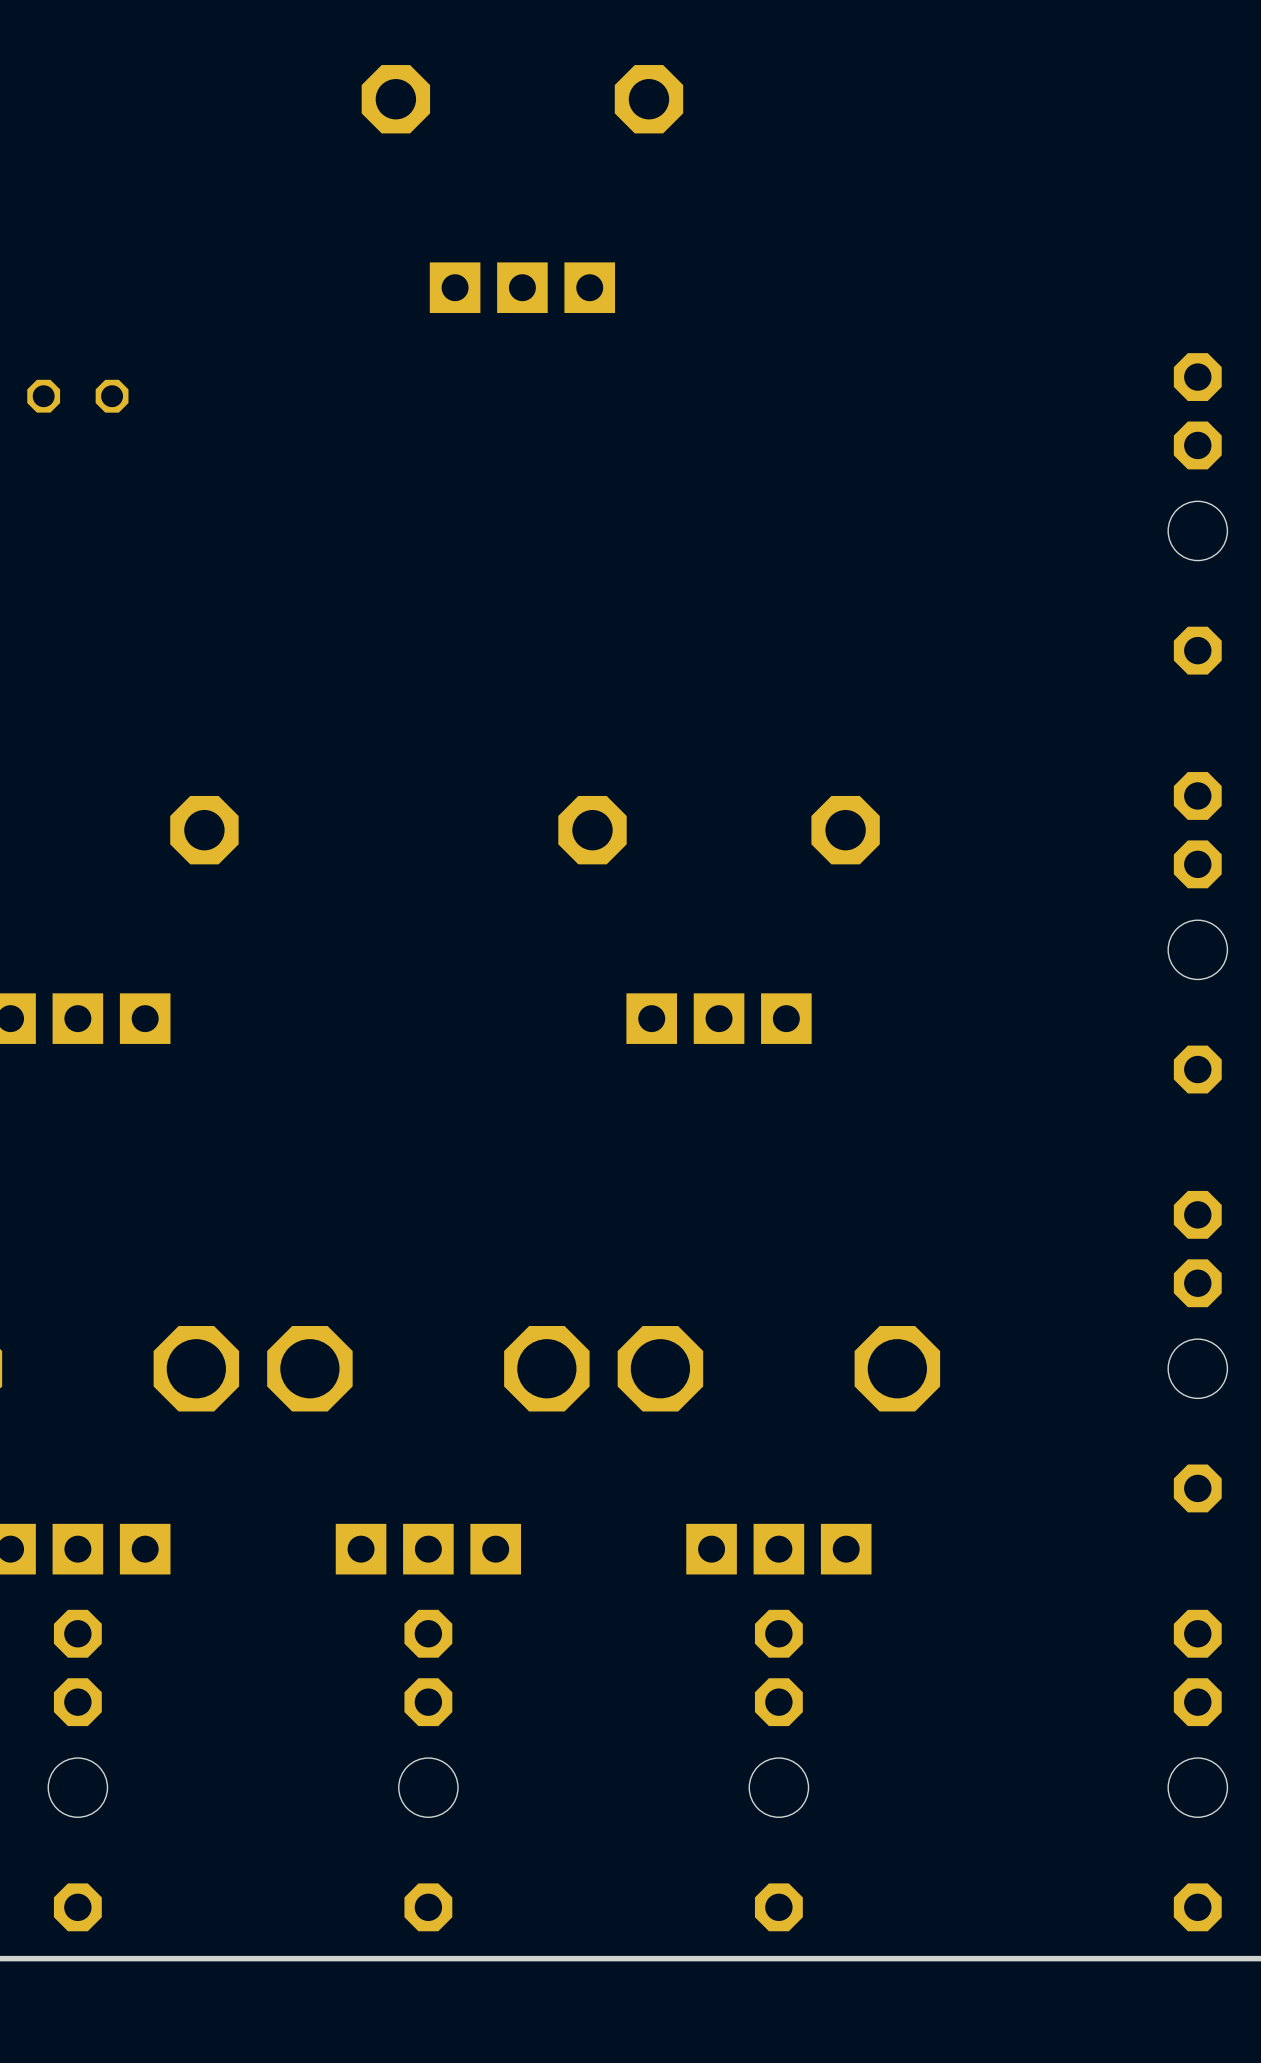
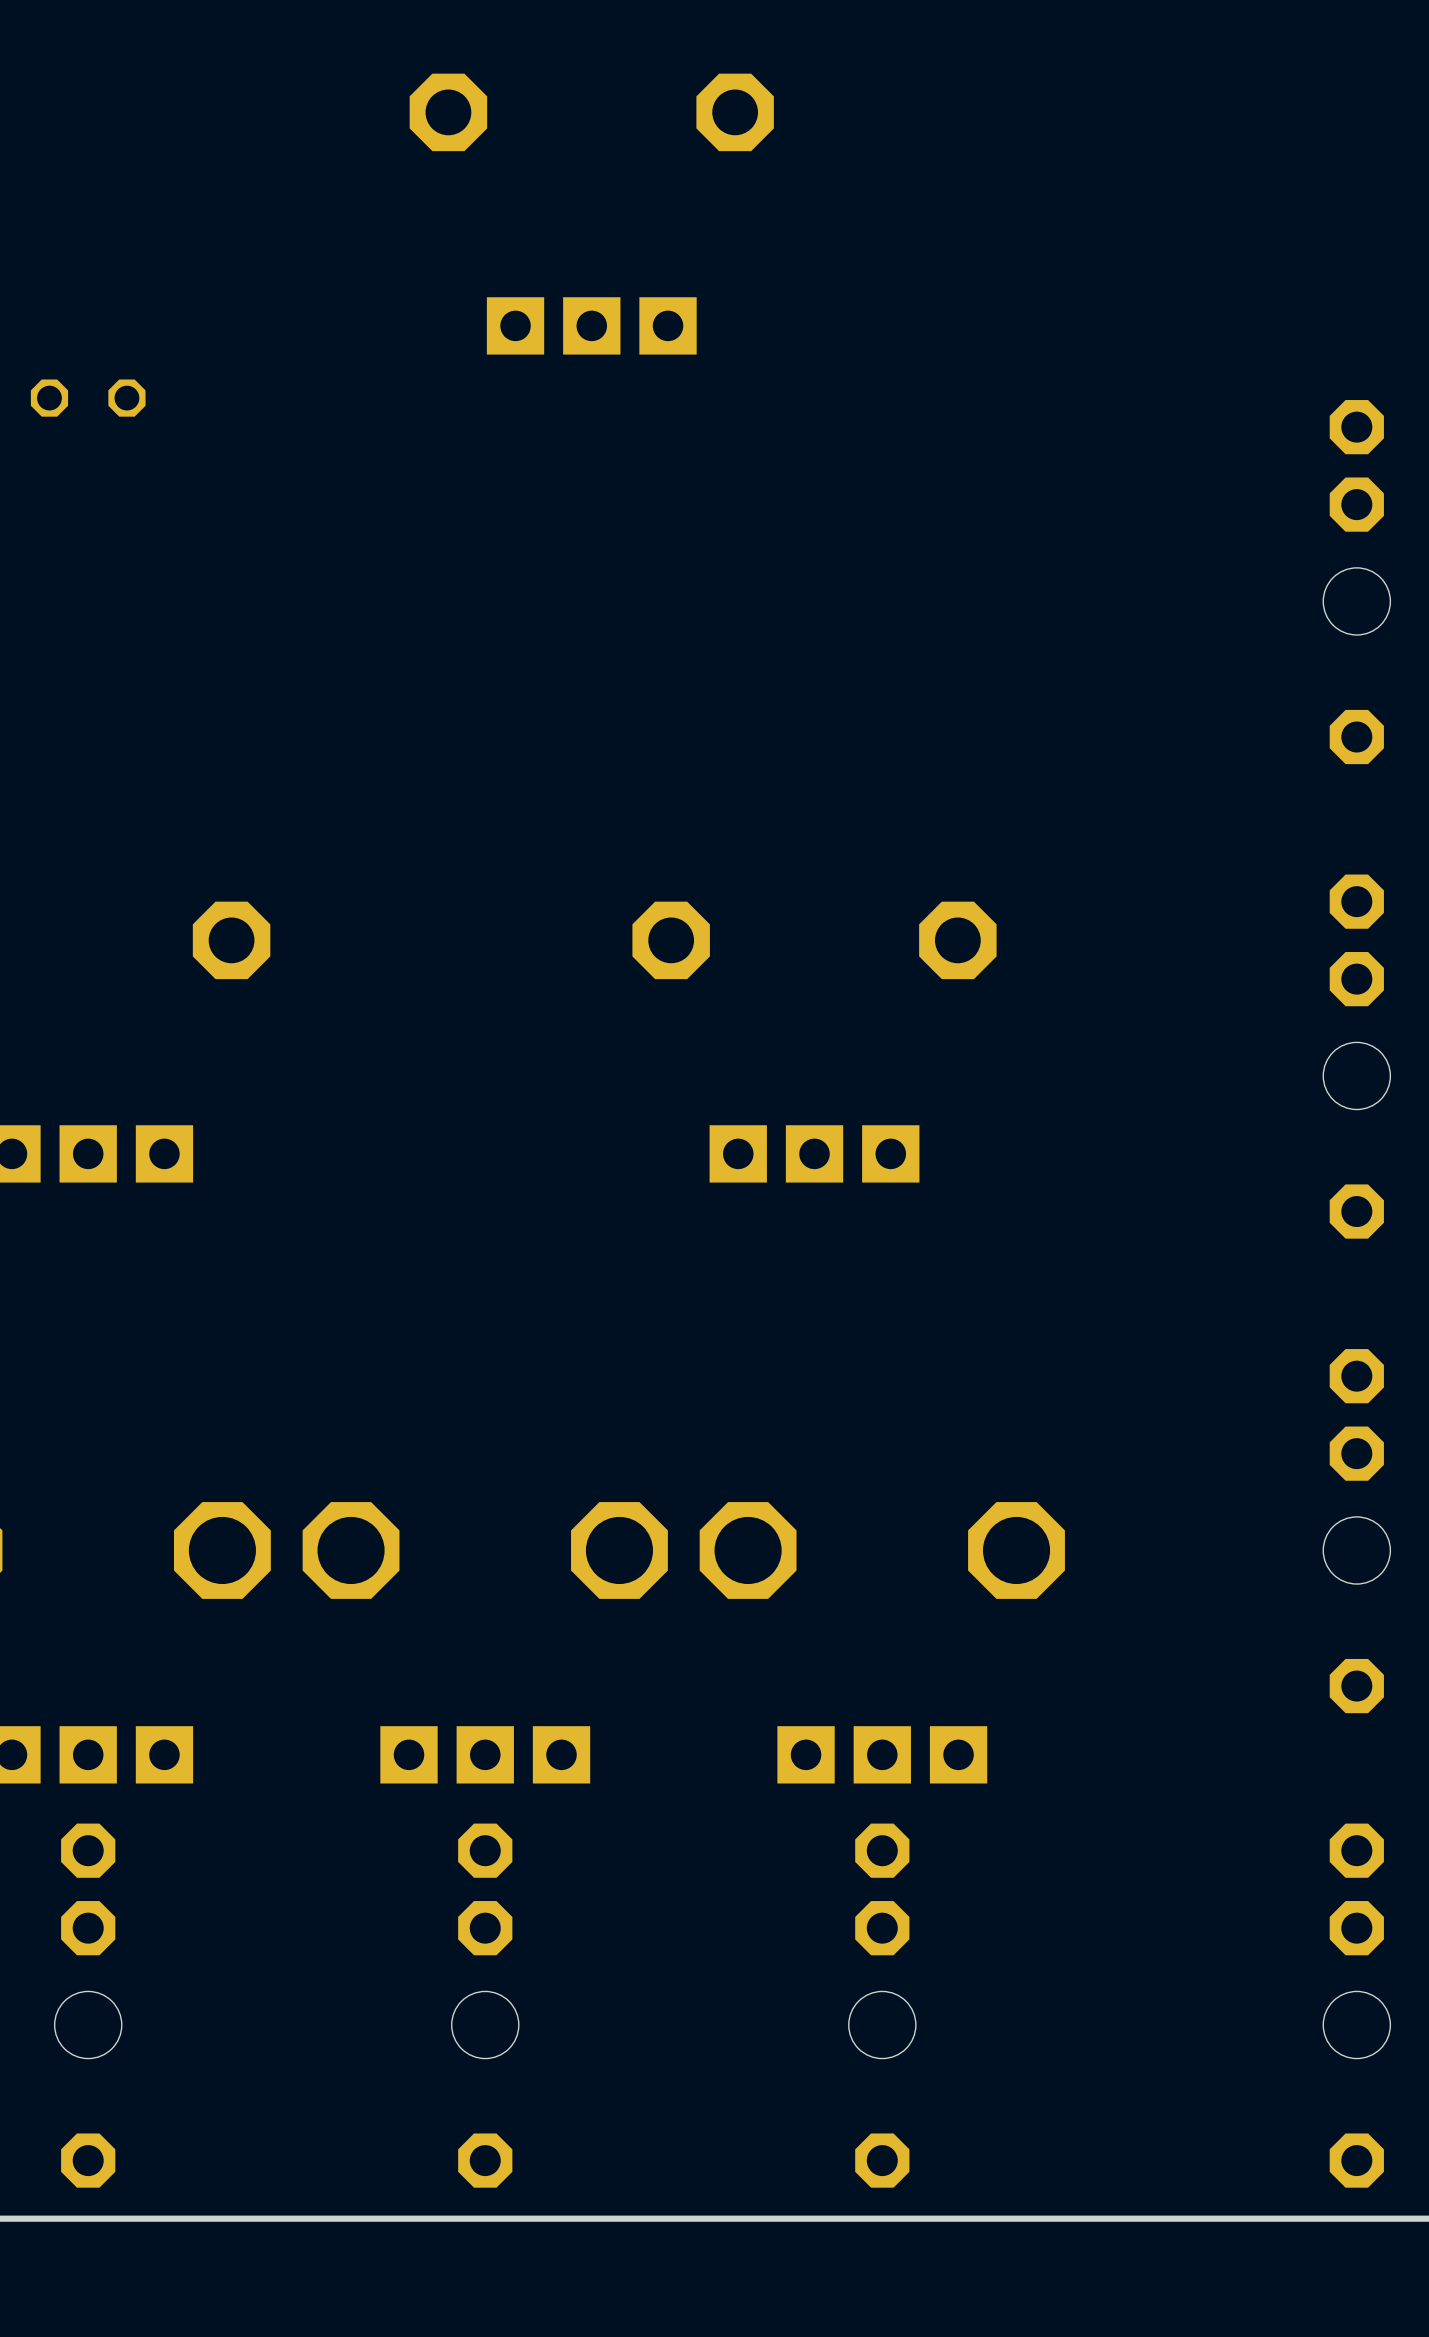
part position: (77, 396) -> (88, 398)

